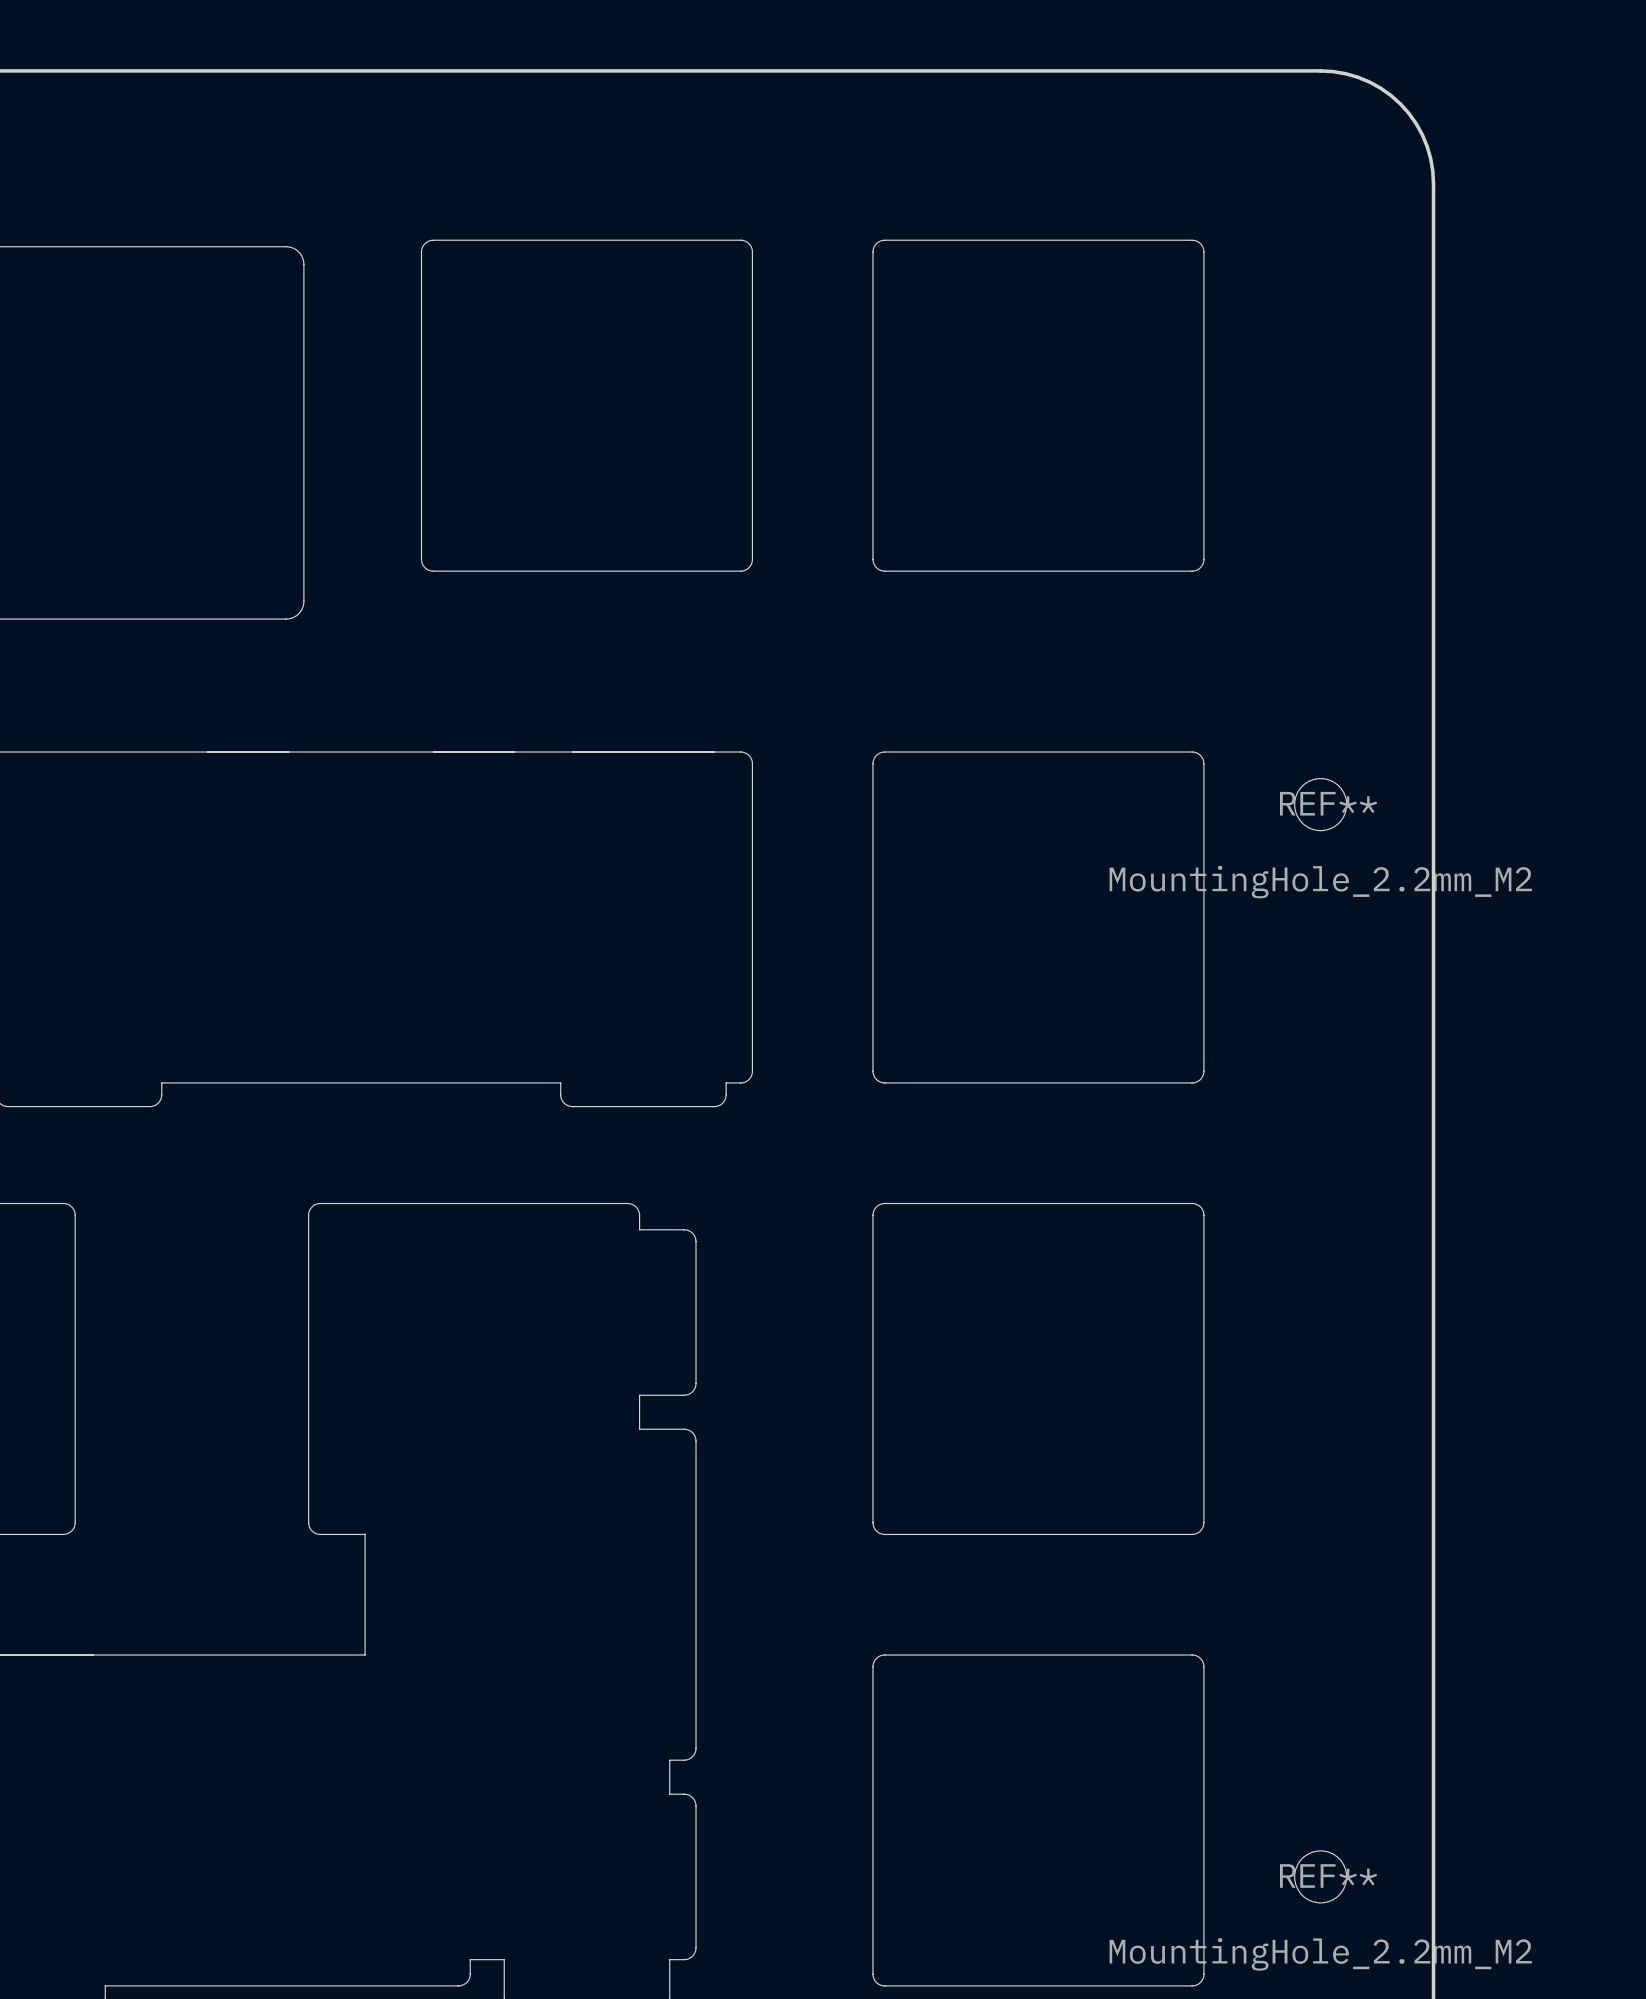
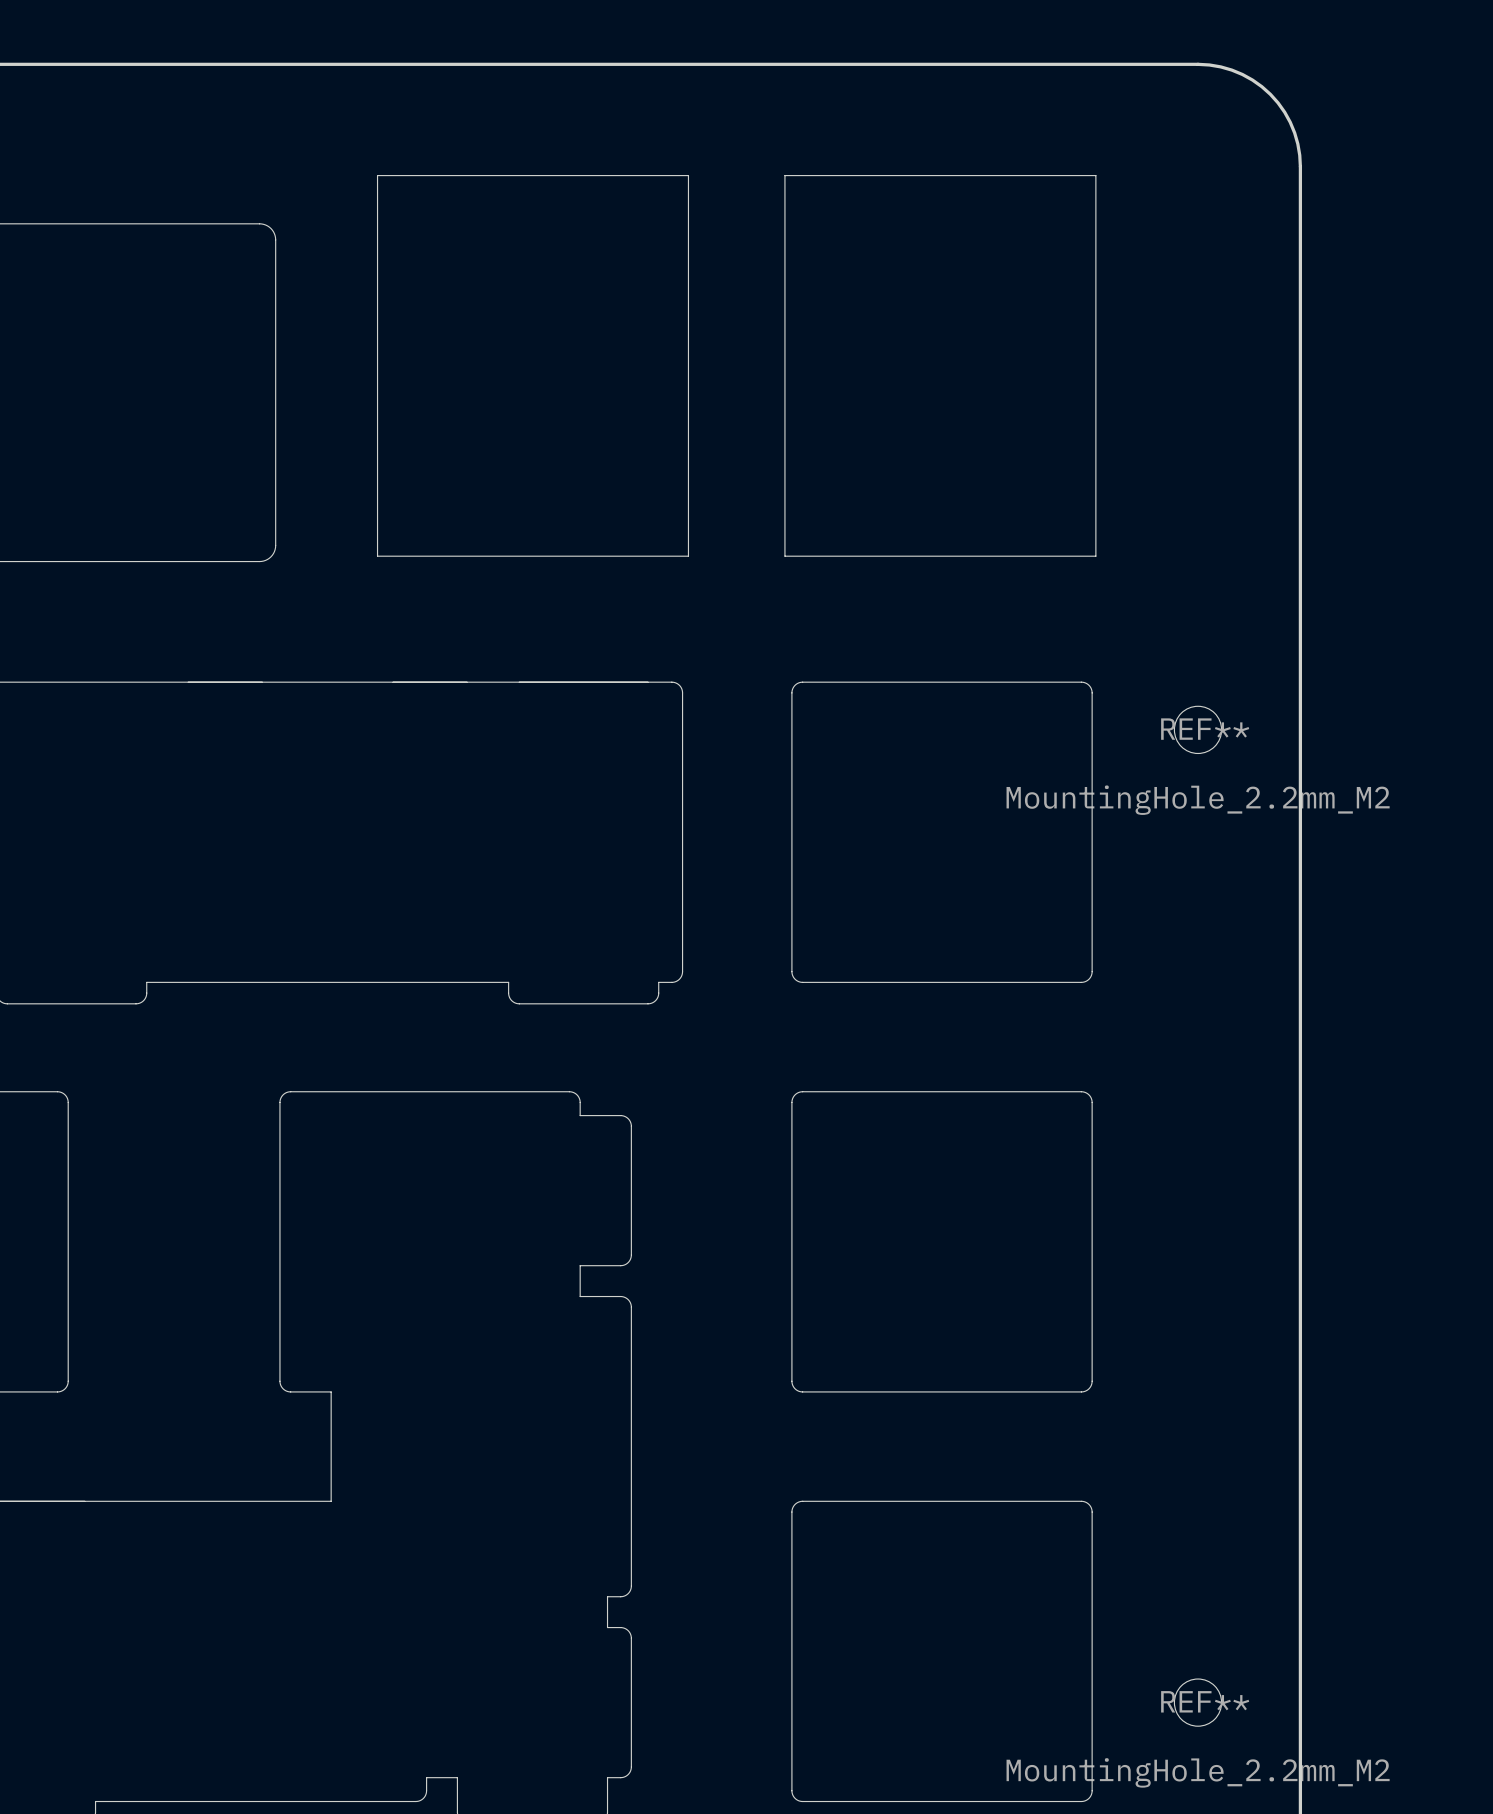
board edge: (433, 240) (740, 240) (748, 243) (752, 252) (752, 559) (748, 567) (740, 571) (433, 571) (424, 567) (421, 559) (421, 252) (424, 243) (433, 240) -> (377, 175) (377, 556) (688, 556) (688, 175) (377, 175)
board edge: (884, 240) (1192, 240) (1200, 243) (1203, 252) (1203, 559) (1200, 567) (1192, 571) (884, 571) (876, 567) (872, 559) (872, 252) (876, 243) (884, 240) -> (784, 175) (784, 556) (1095, 556) (1095, 175) (784, 175)

